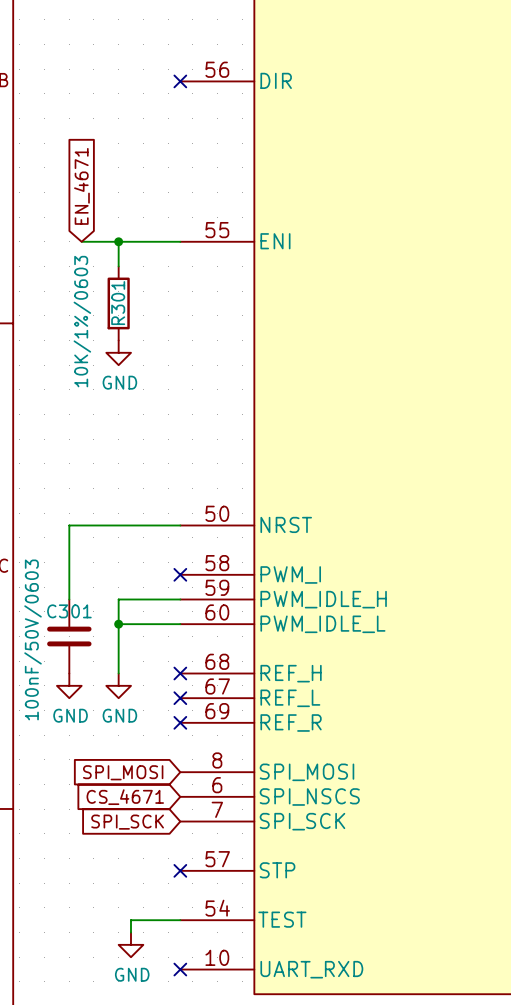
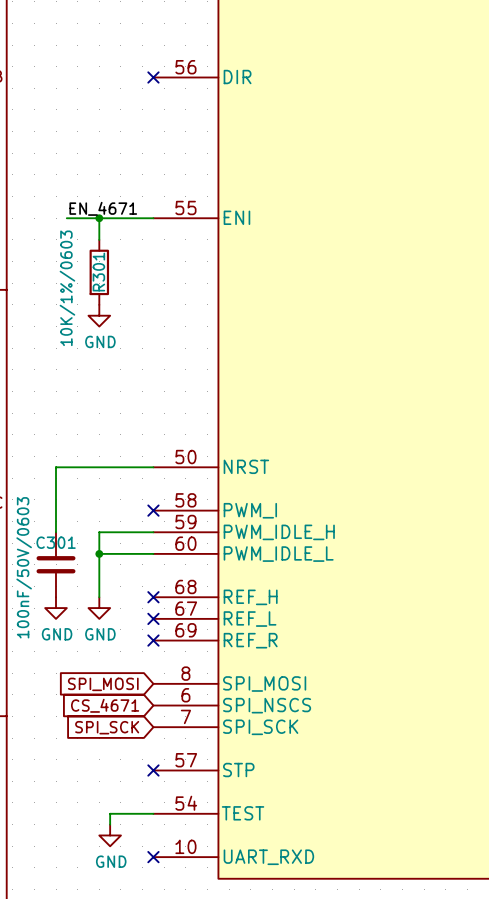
global label: EN_4671 (81, 186) -> none
label: none -> EN_4671 (103, 208)

